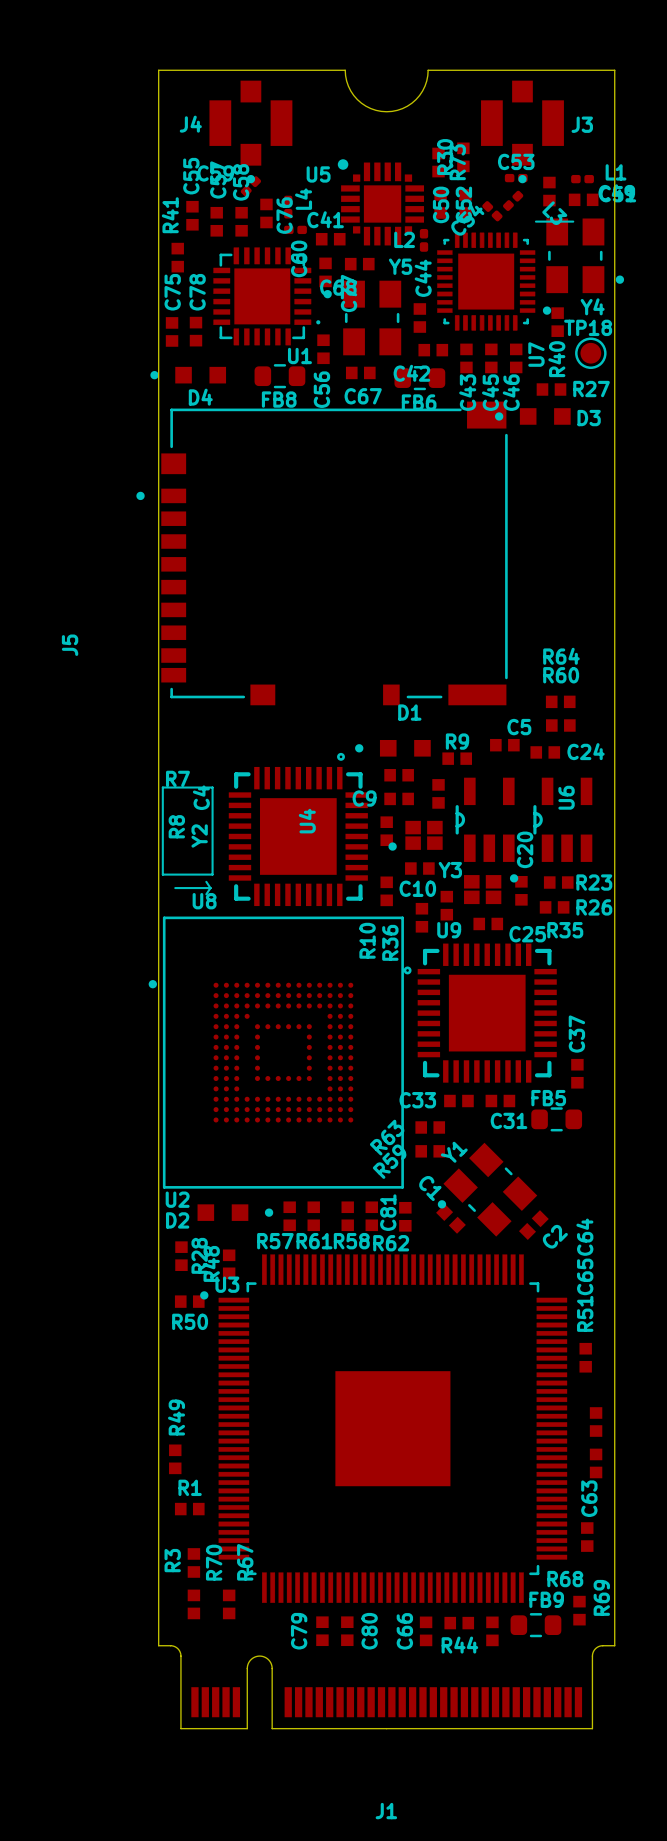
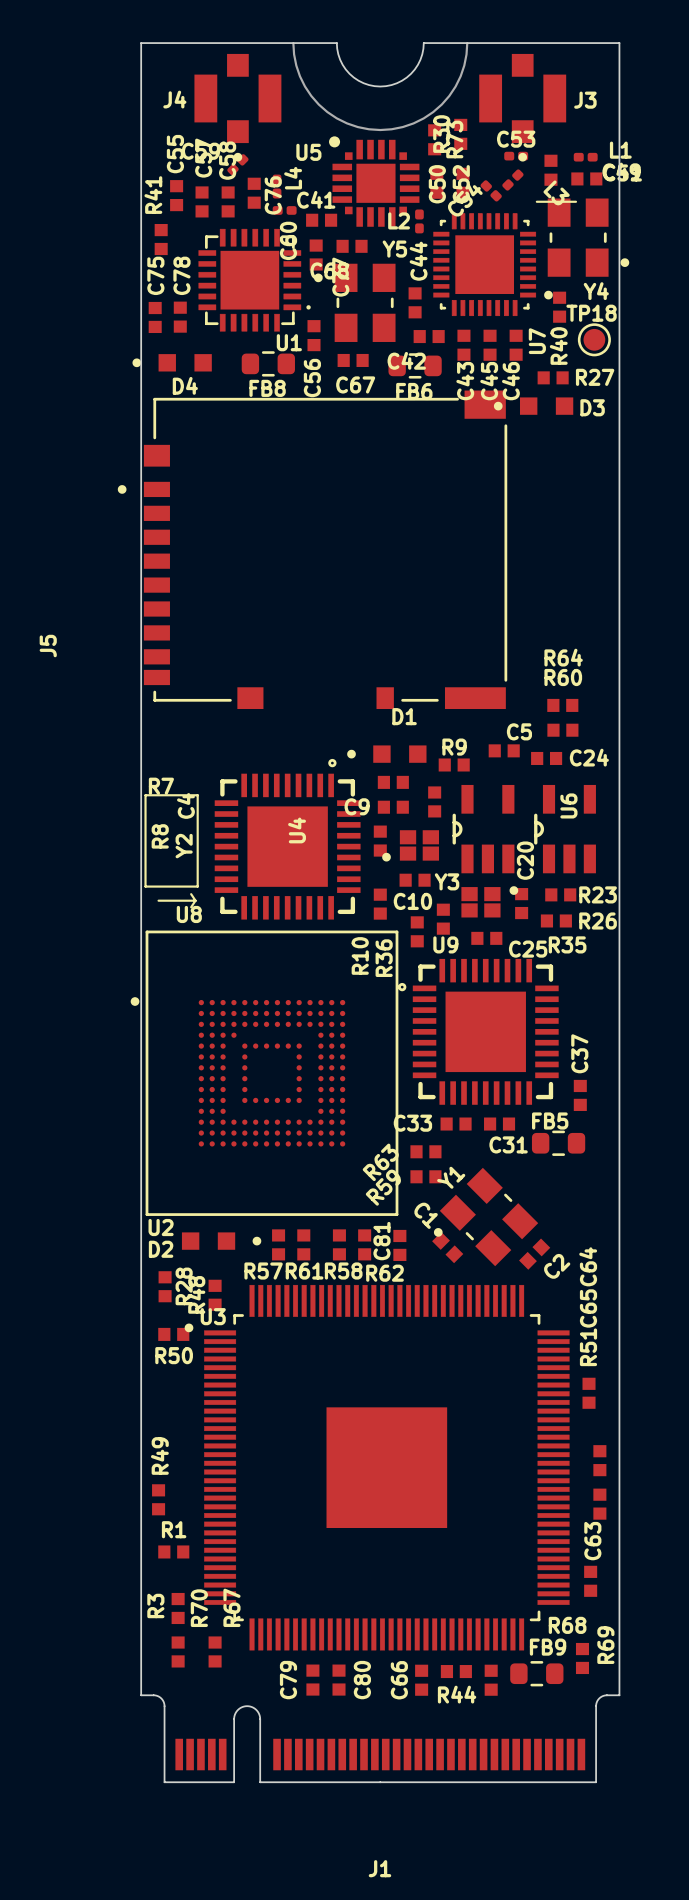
line: none -> (293, 43) (299, 76) (318, 104) (347, 123) (380, 130) (413, 123) (441, 104) (460, 76) (467, 43)

